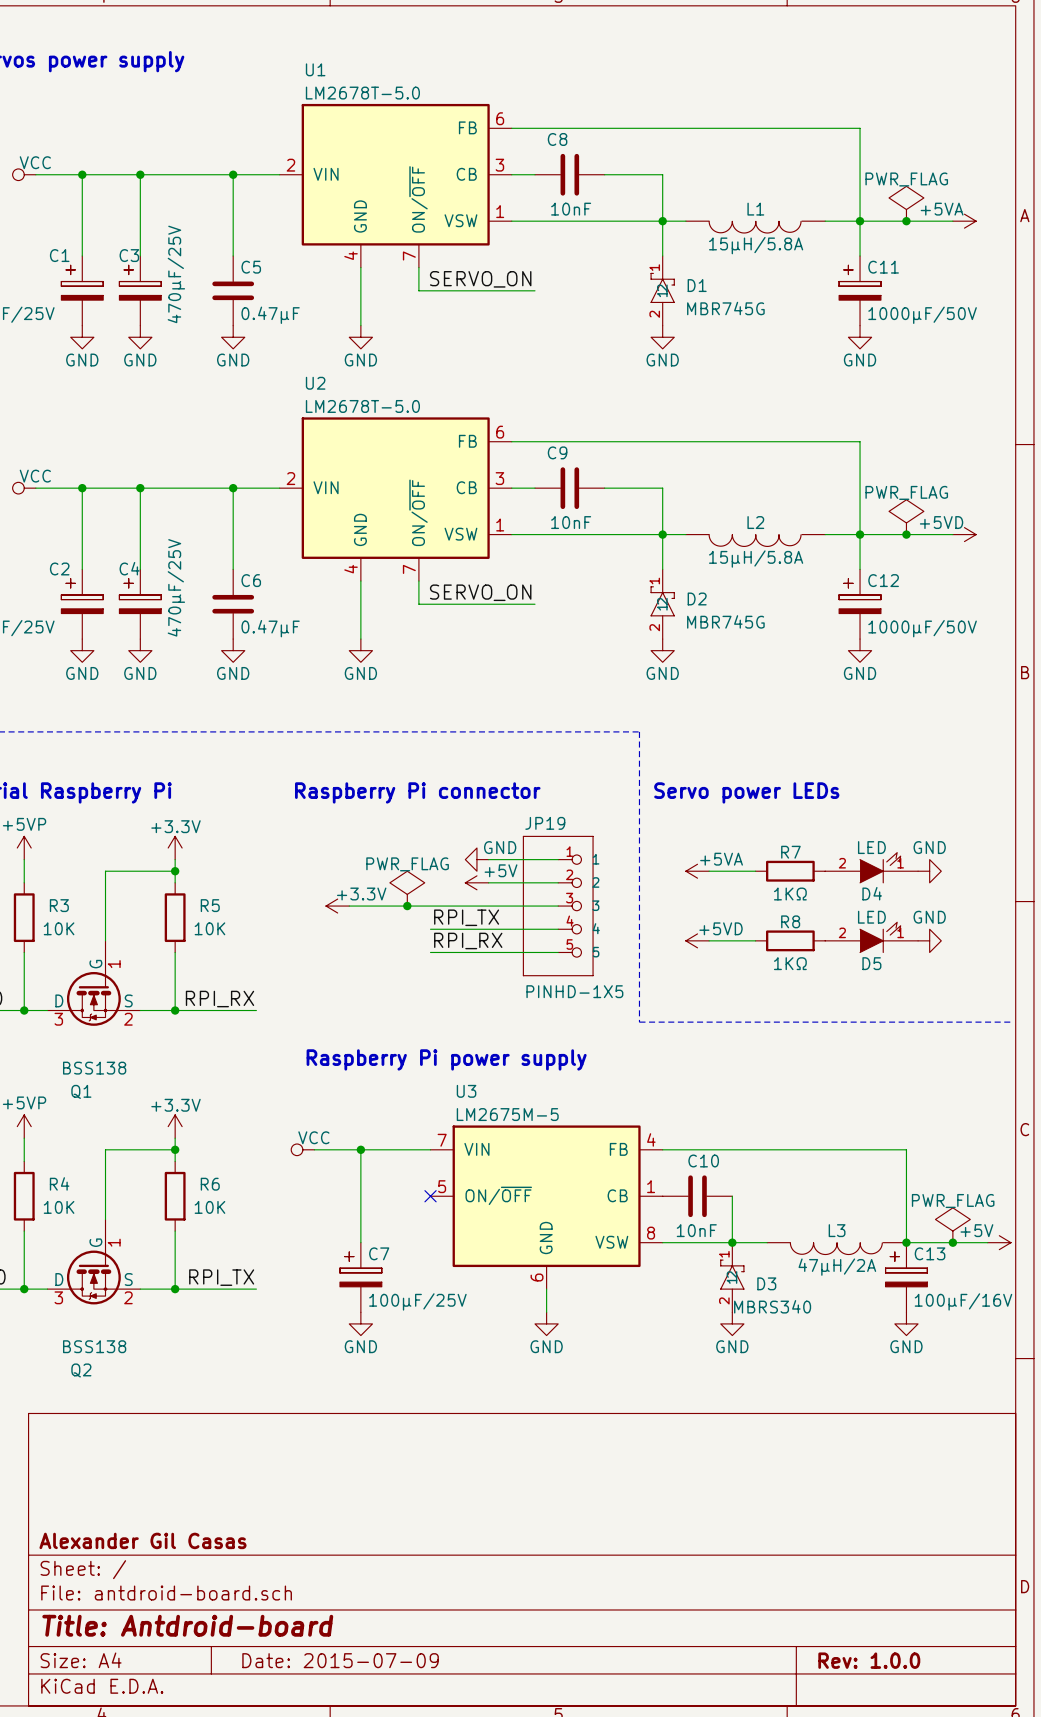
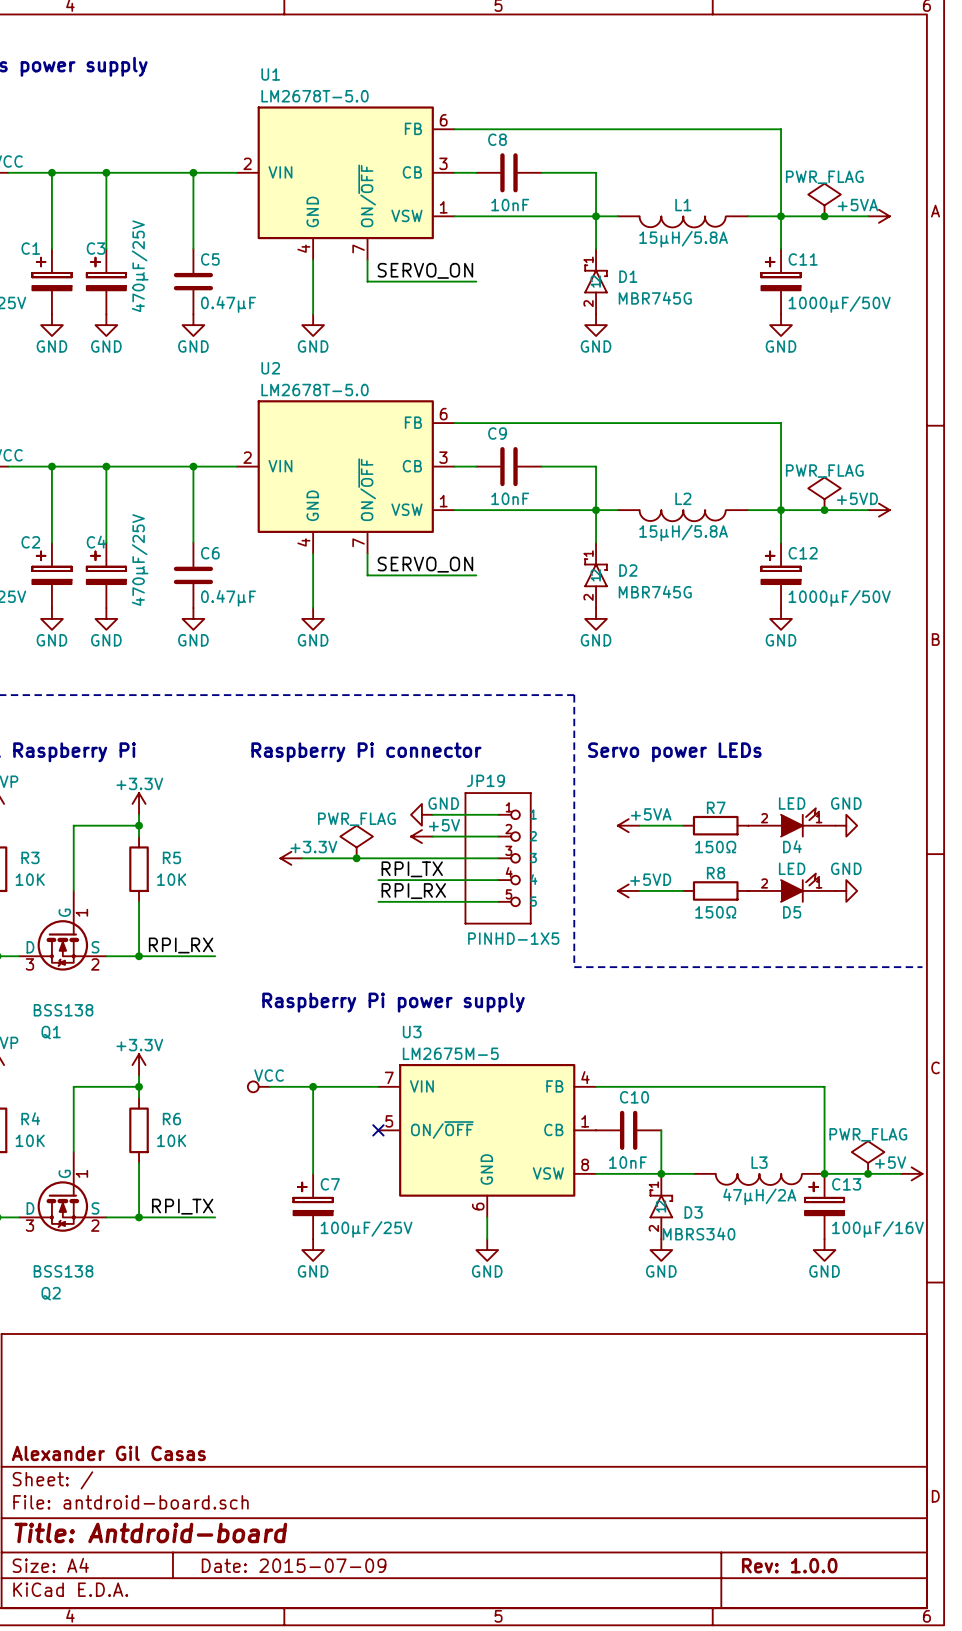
R7 value: 1KΩ (790, 894) -> 150Ω (715, 847)
R8 value: 1KΩ (790, 963) -> 150Ω (715, 912)

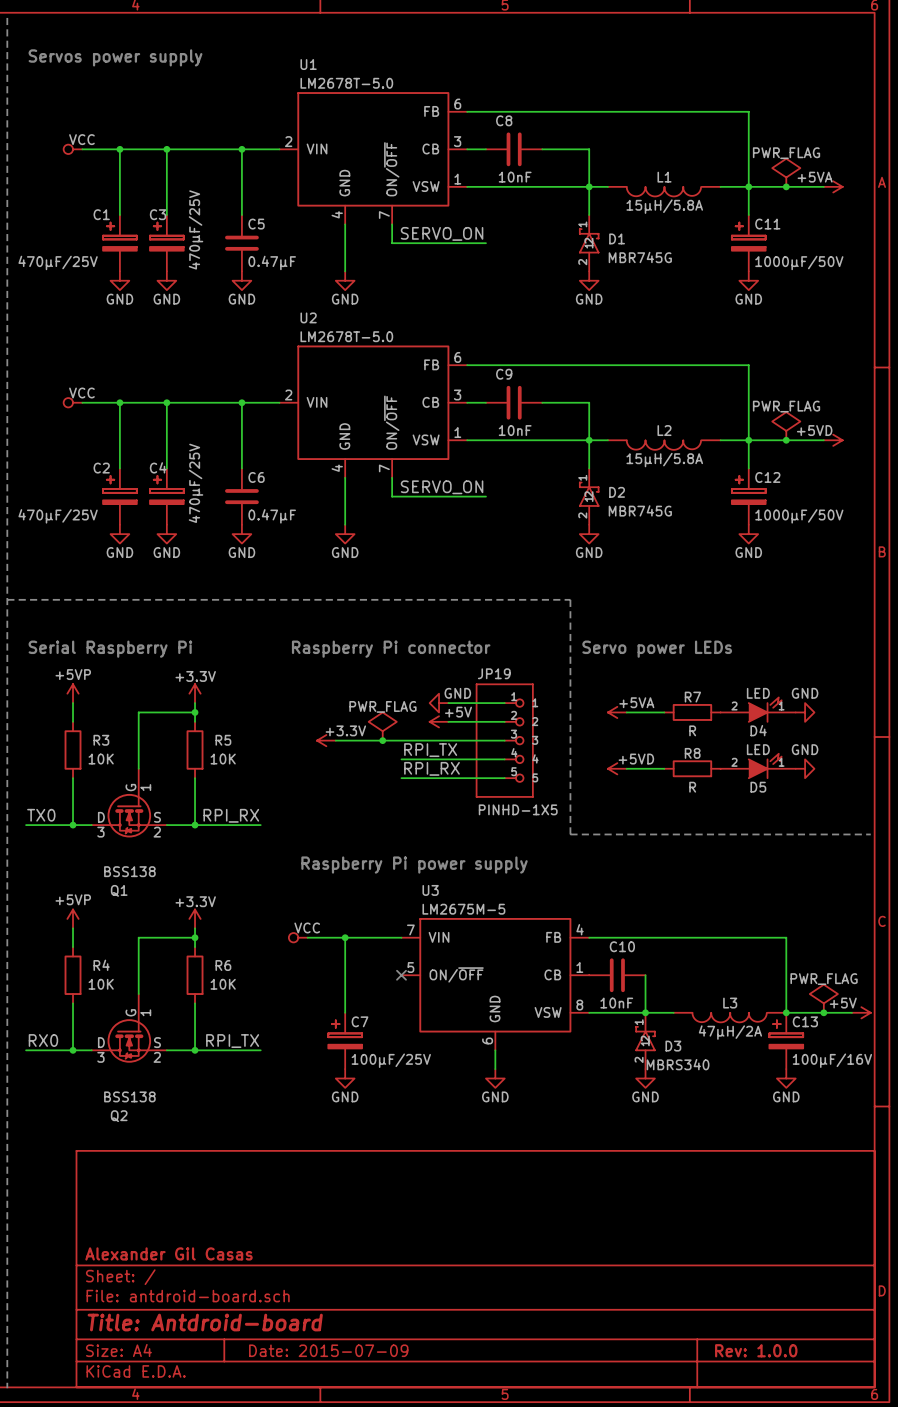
R7 value: 150Ω (715, 847) -> R (692, 730)
R8 value: 150Ω (715, 912) -> R (692, 787)

